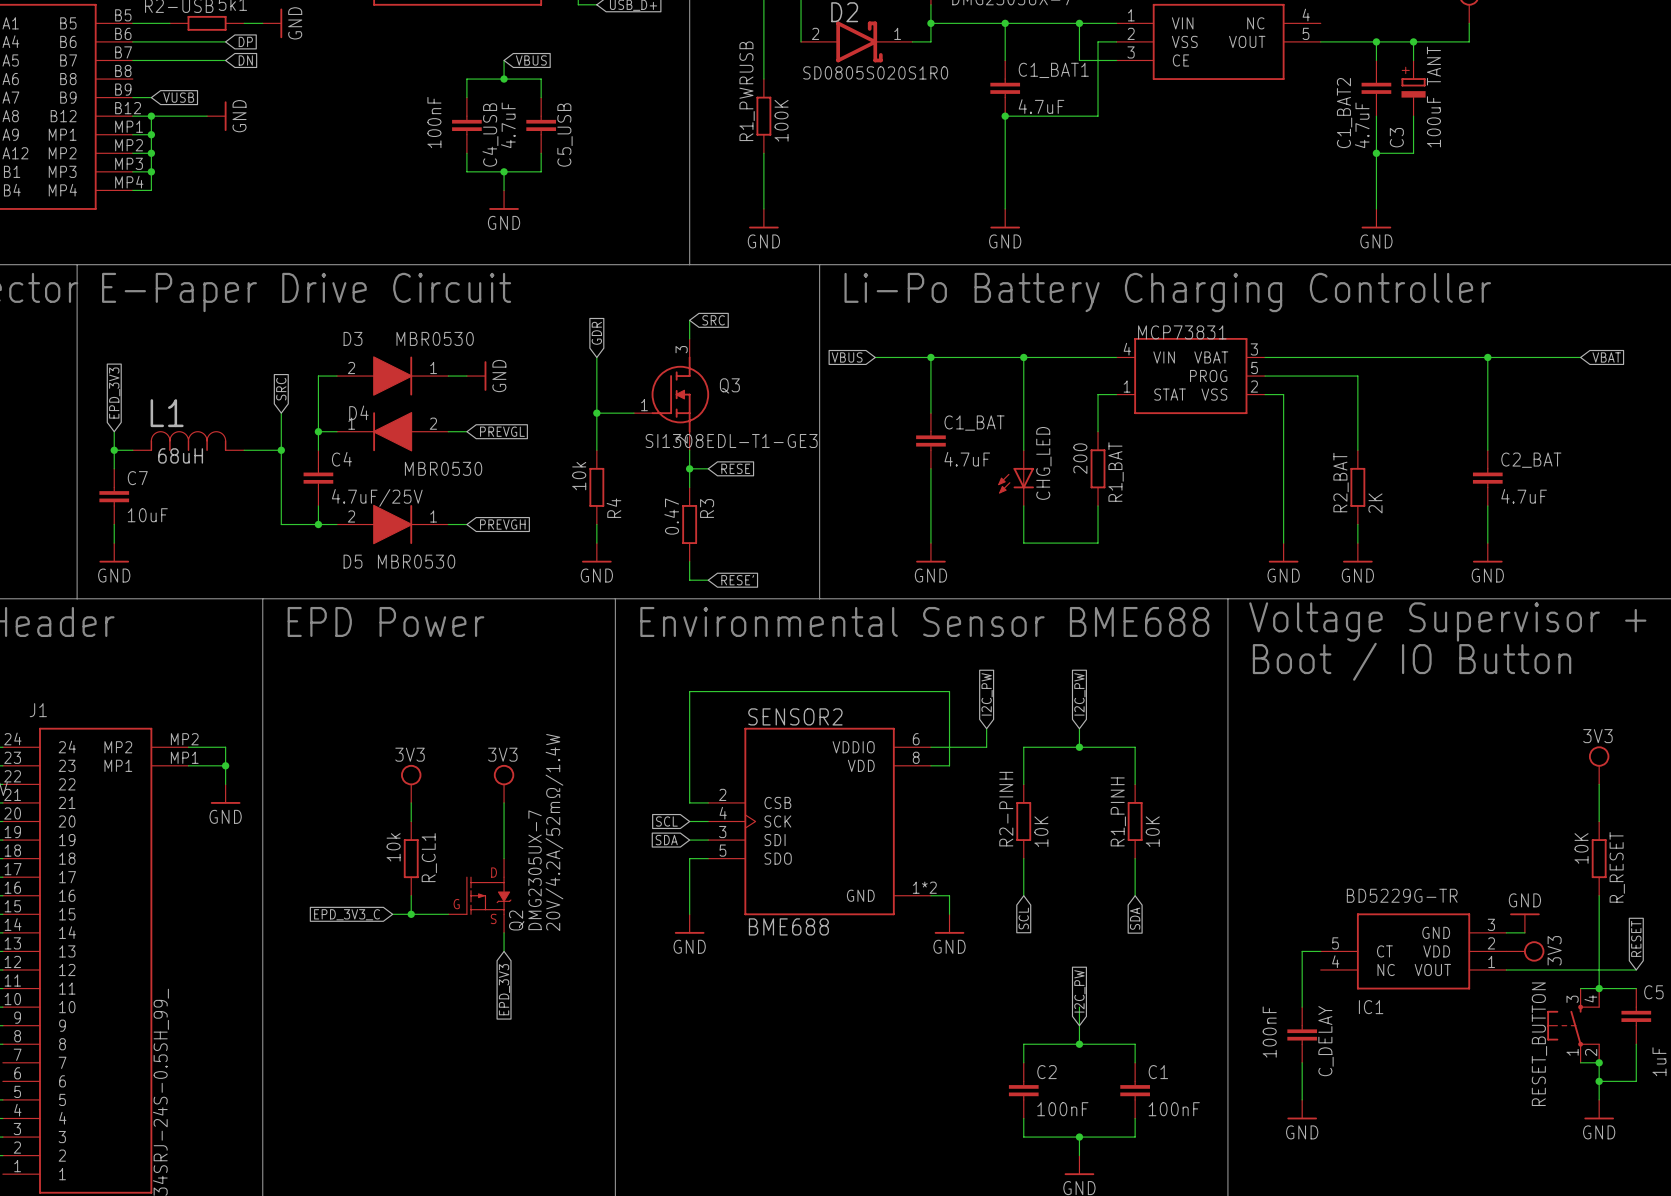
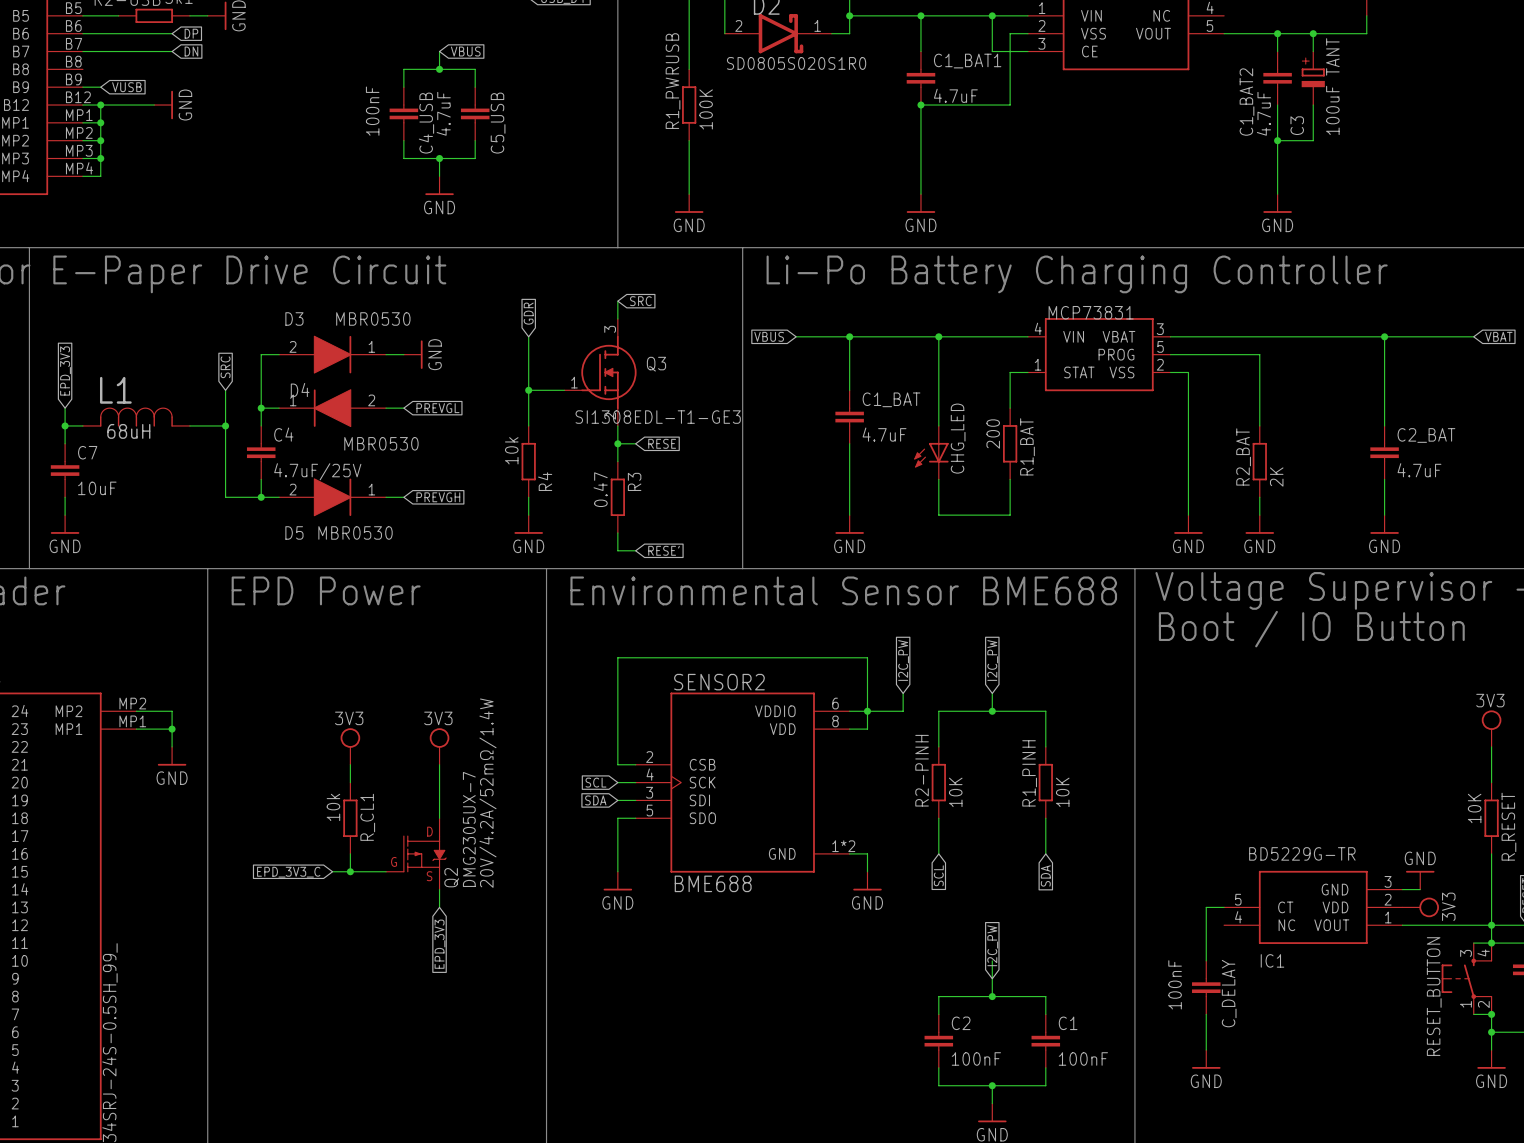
junction: none -> (867, 711)
junction: none -> (1491, 925)

